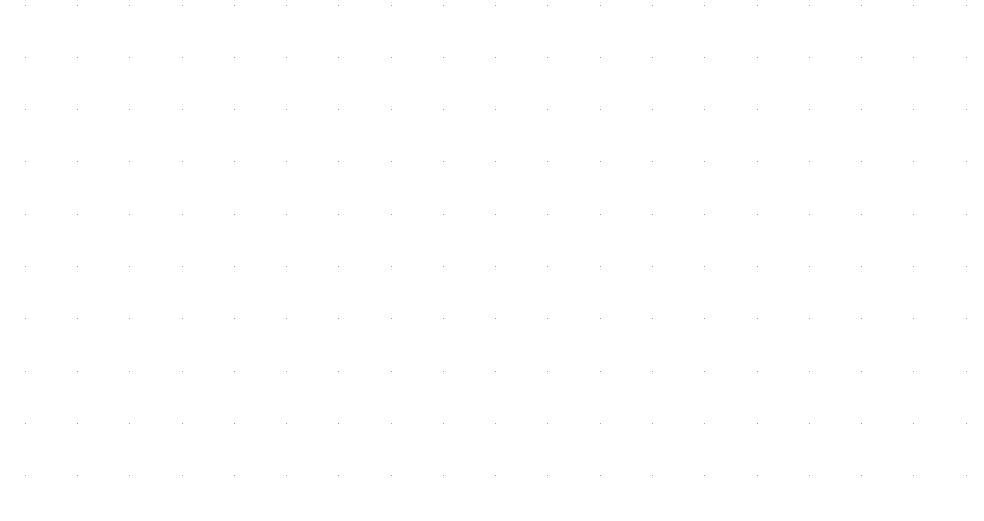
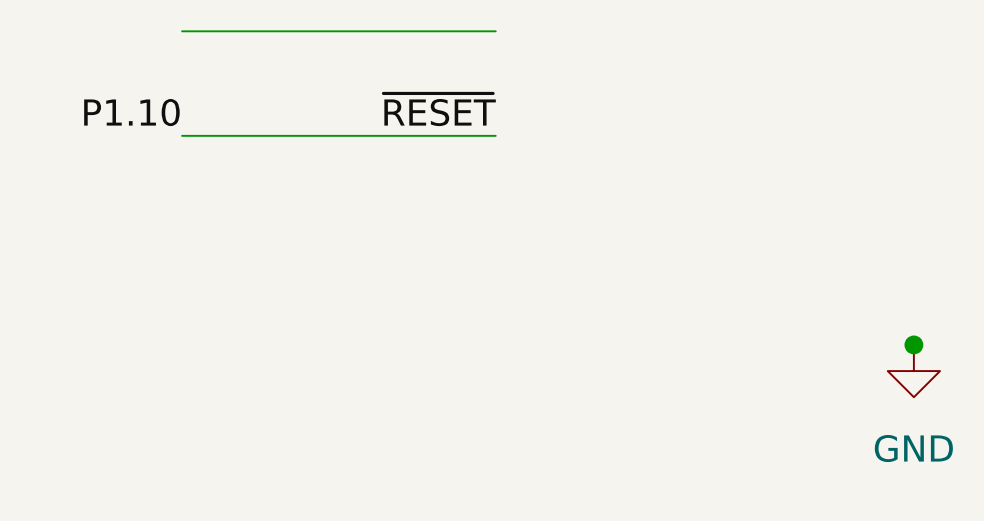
wire: none -> (182, 31) (495, 31)
label: none -> ~{RESET} (439, 109)
label: none -> P1.10 (131, 112)
wire: none -> (182, 135) (495, 135)
junction: none -> (913, 344)
power symbol: none -> GND (913, 371)

